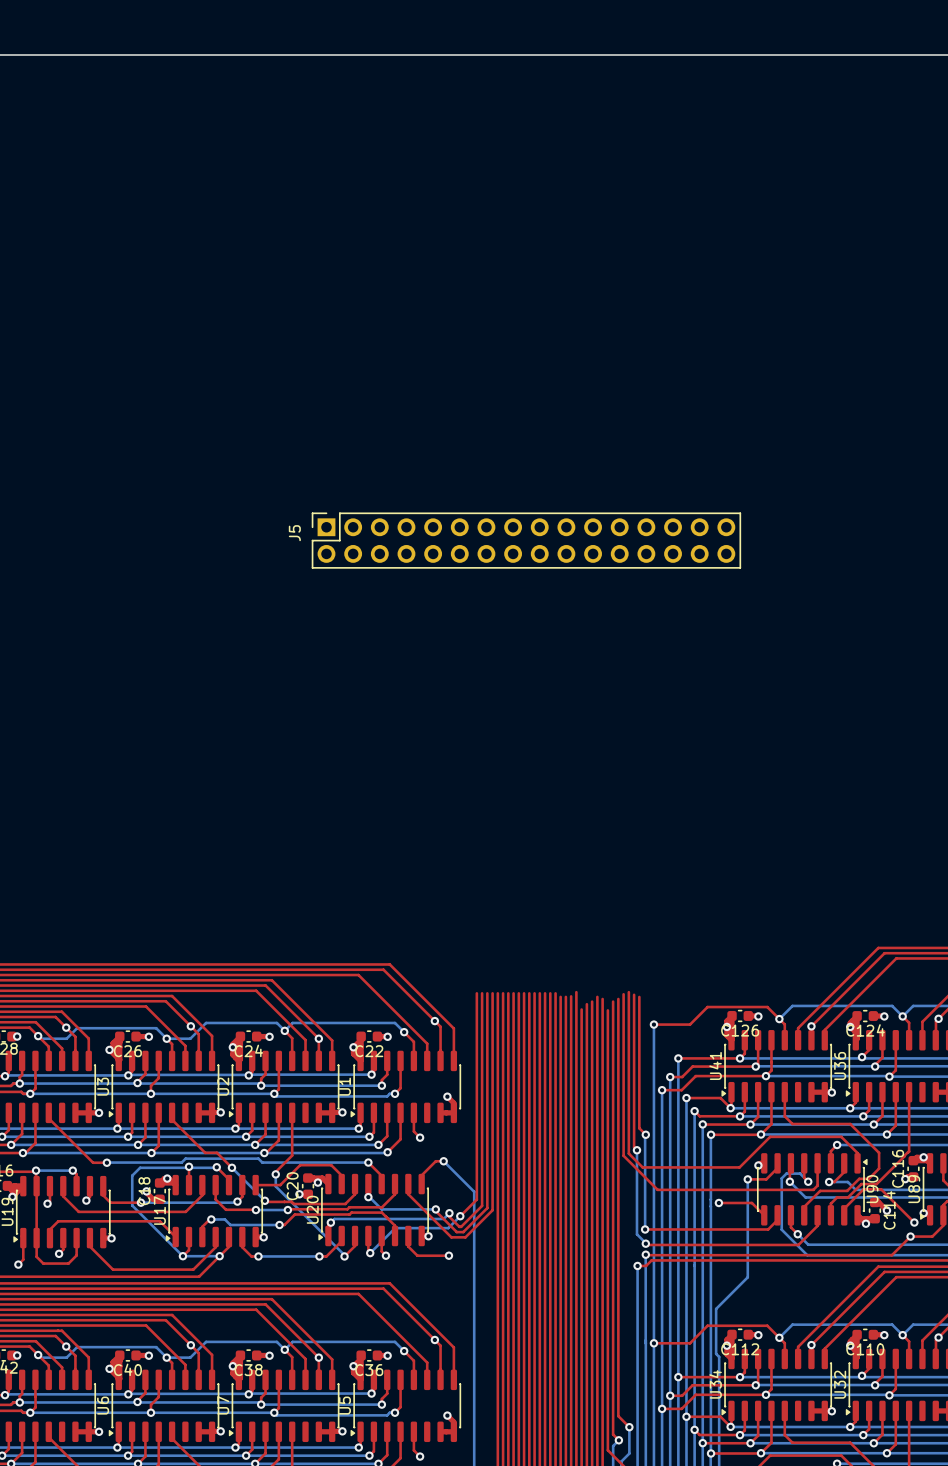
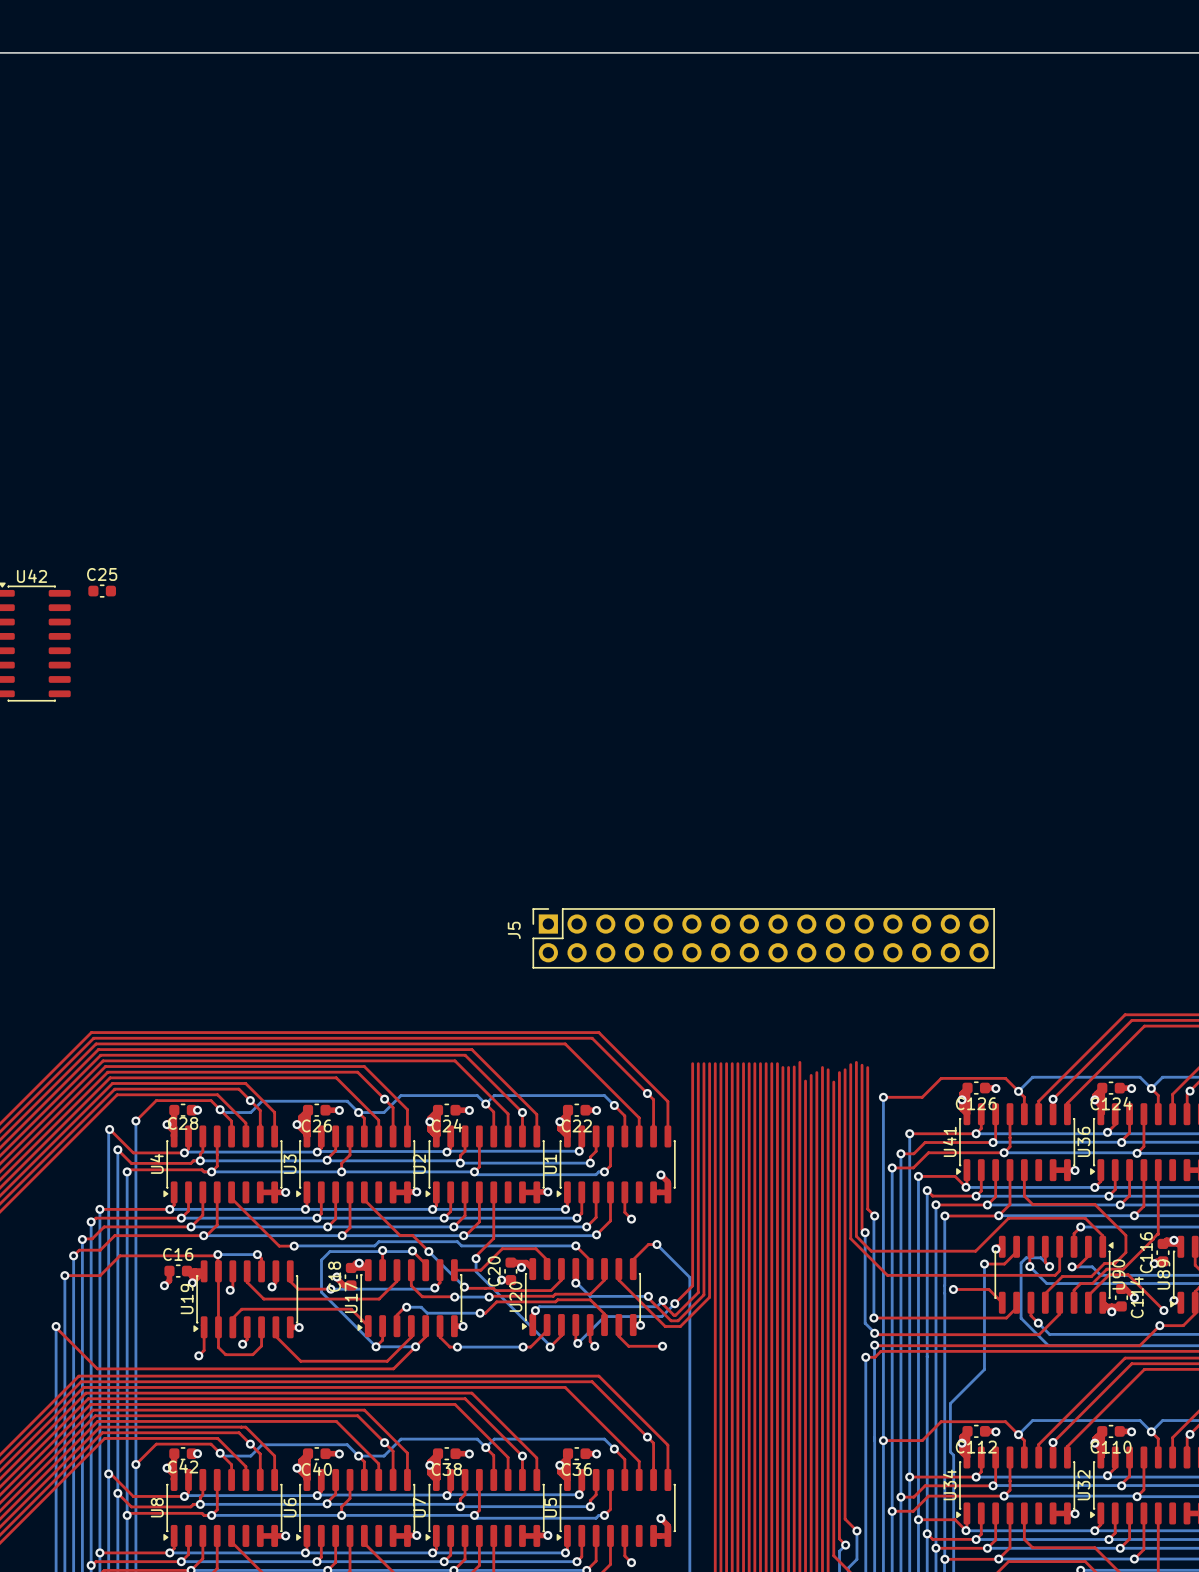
J5 position: (526, 540) -> (763, 938)

